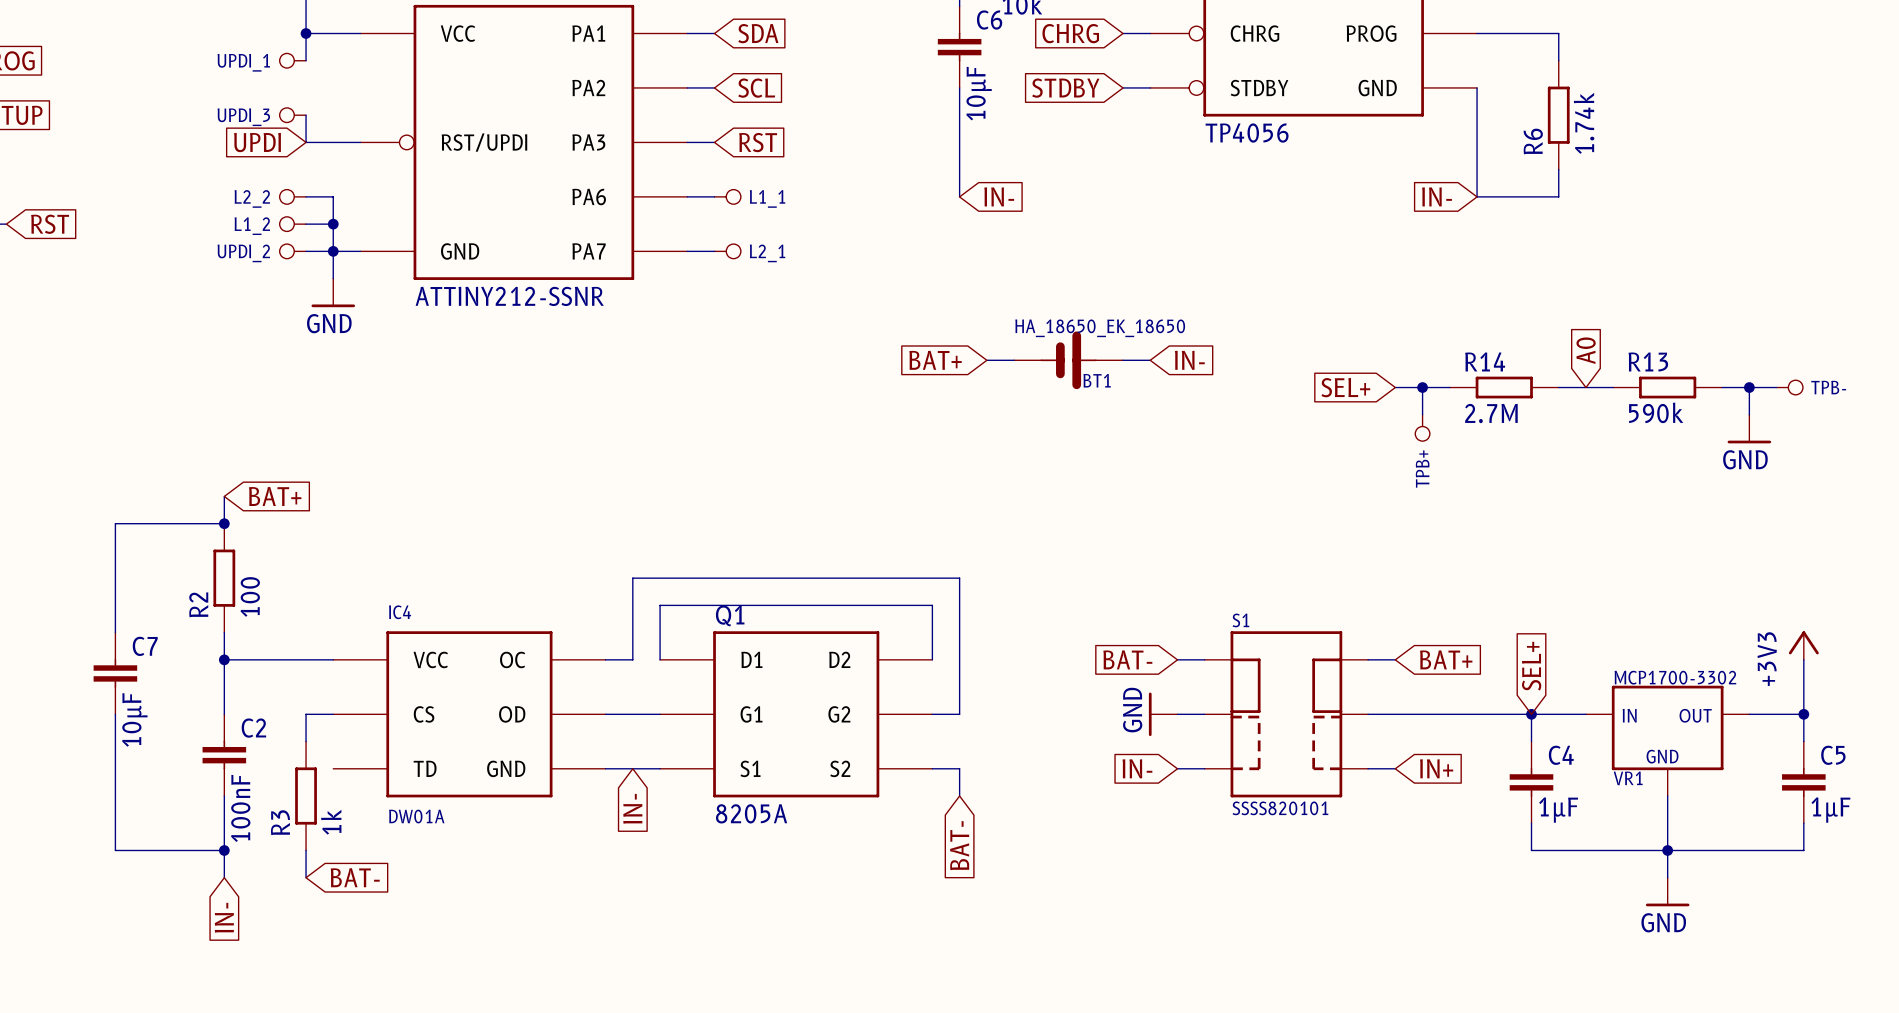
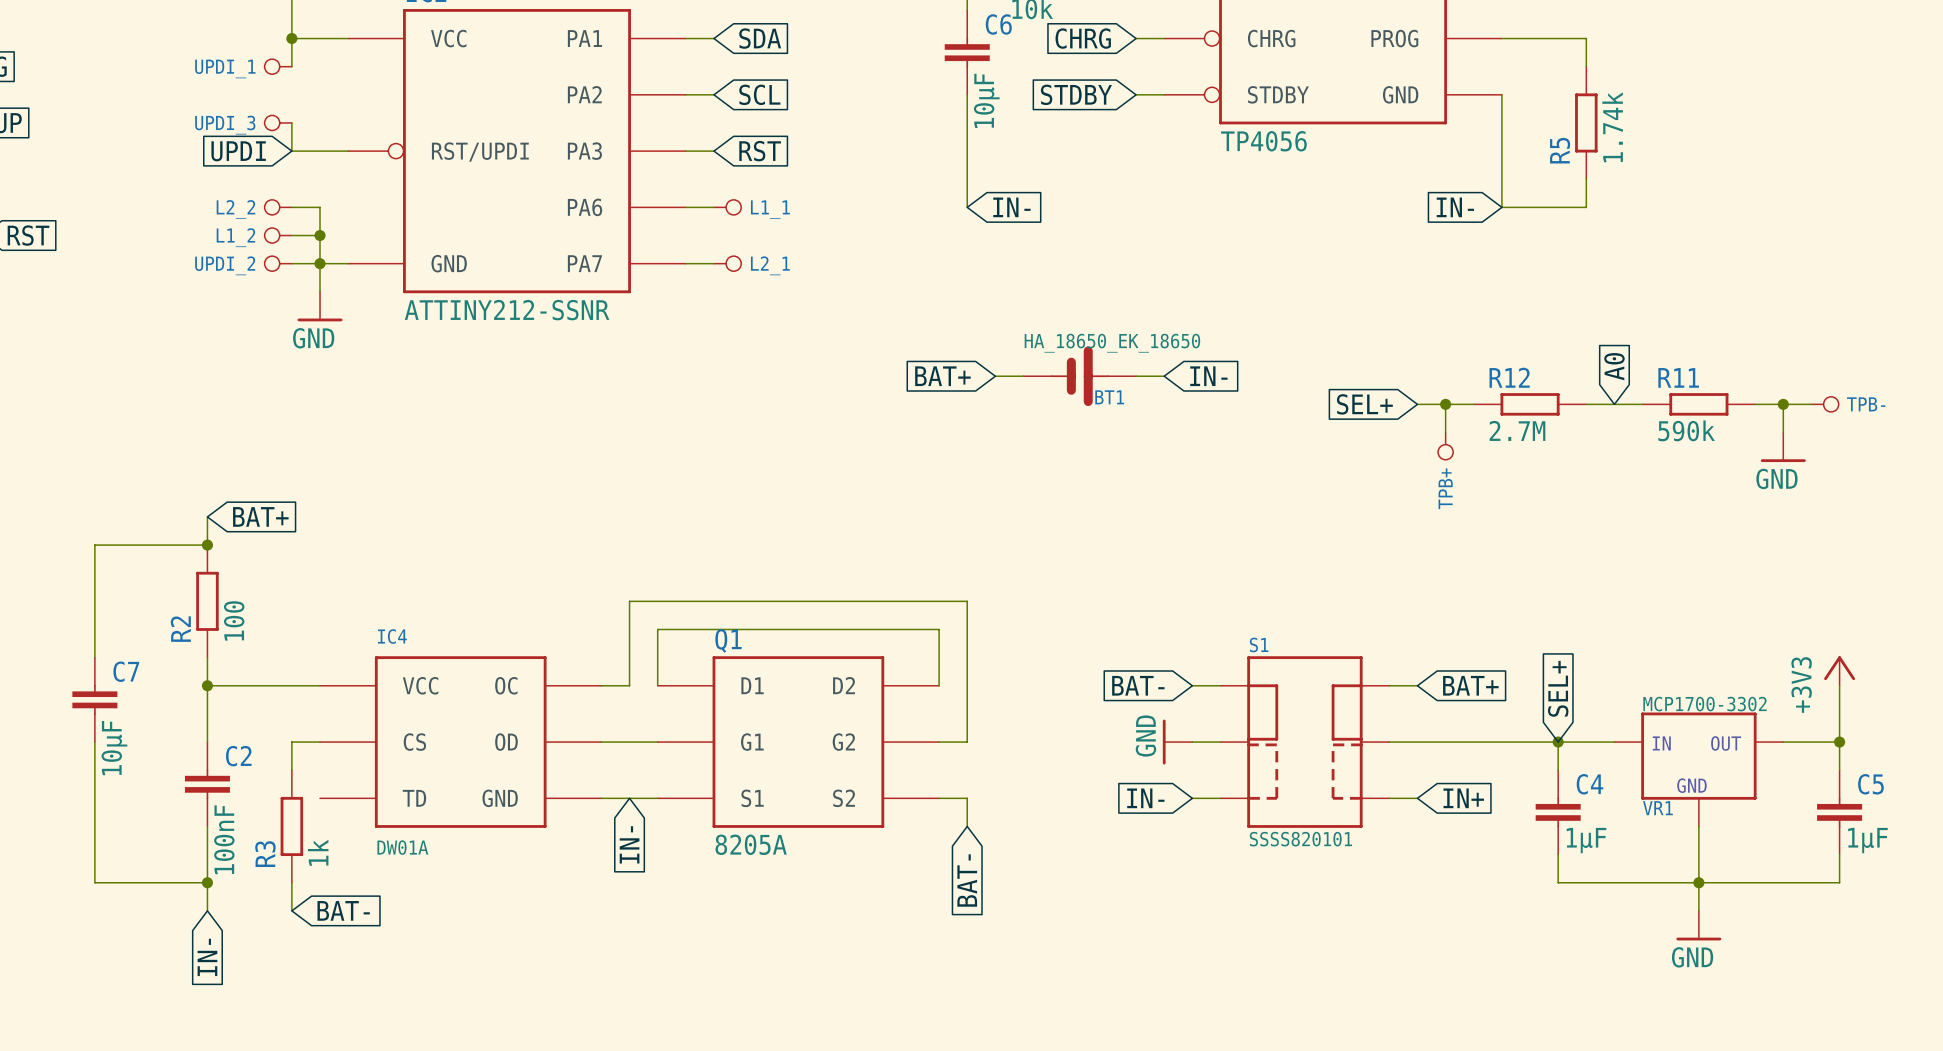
R6 name: R6 (1533, 141) -> R5 (1560, 150)
R14 name: R14 (1485, 361) -> R12 (1509, 377)
R13 name: R13 (1648, 361) -> R11 (1678, 377)

